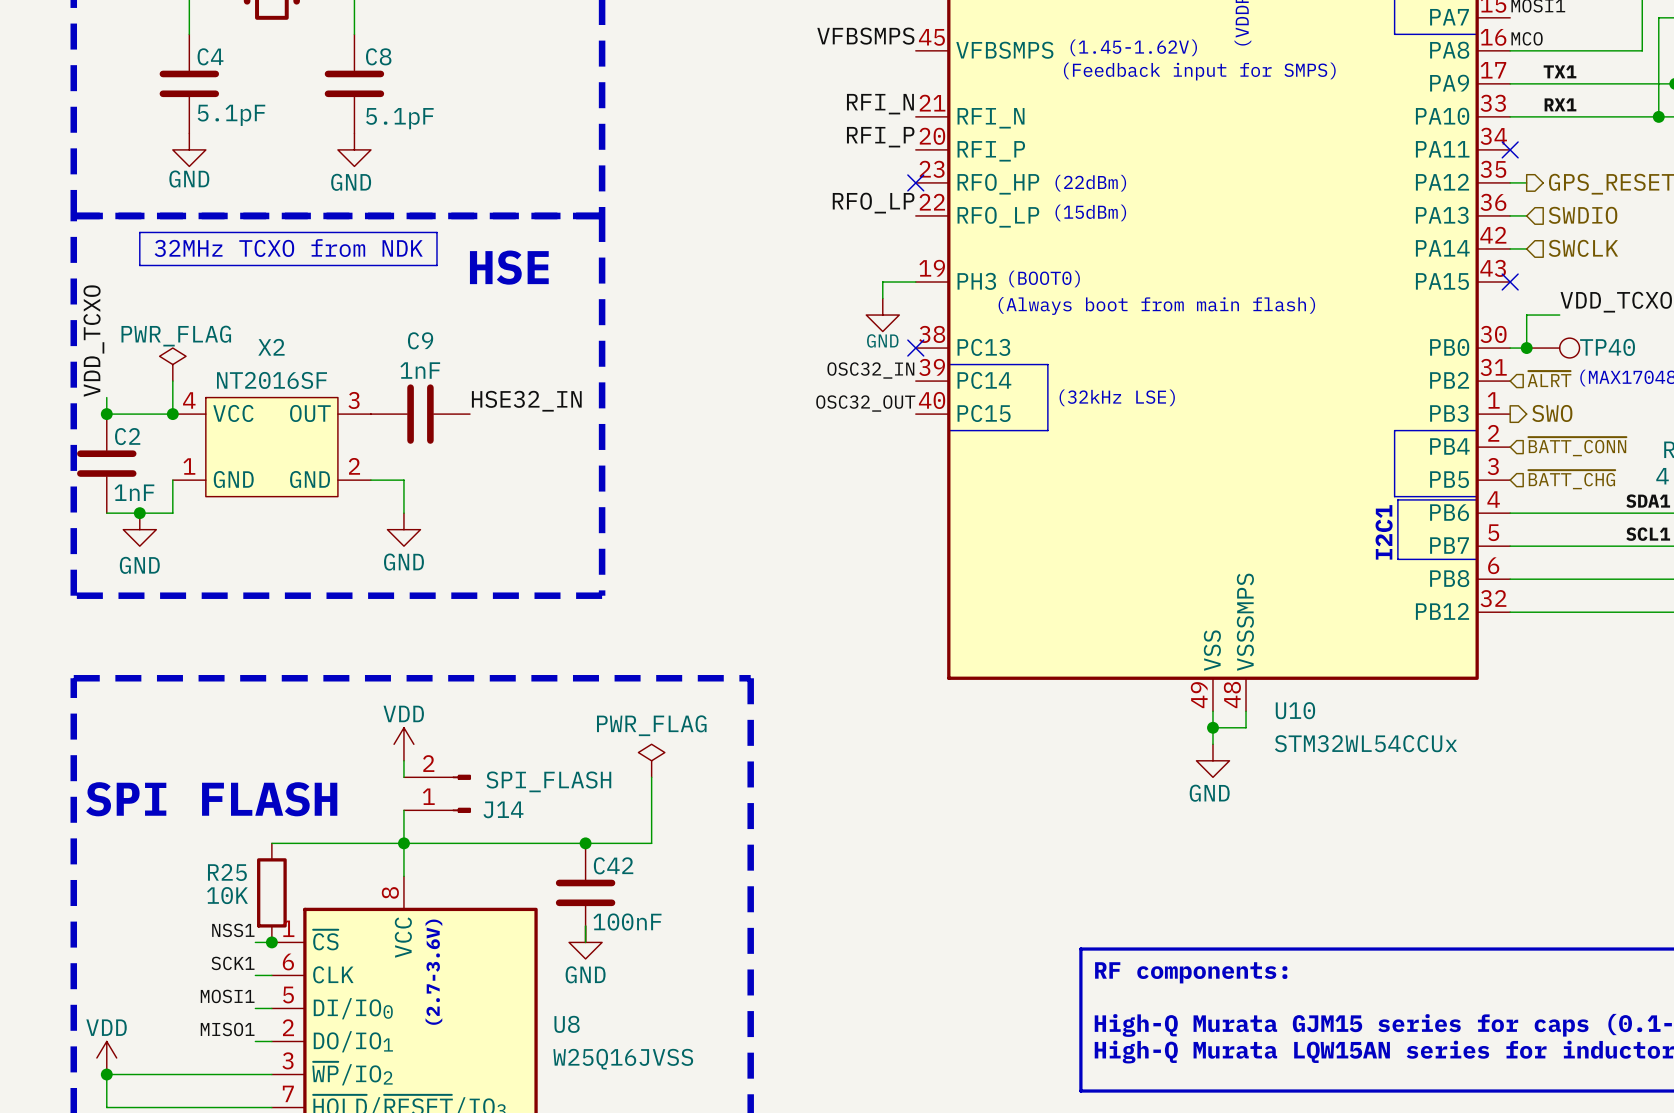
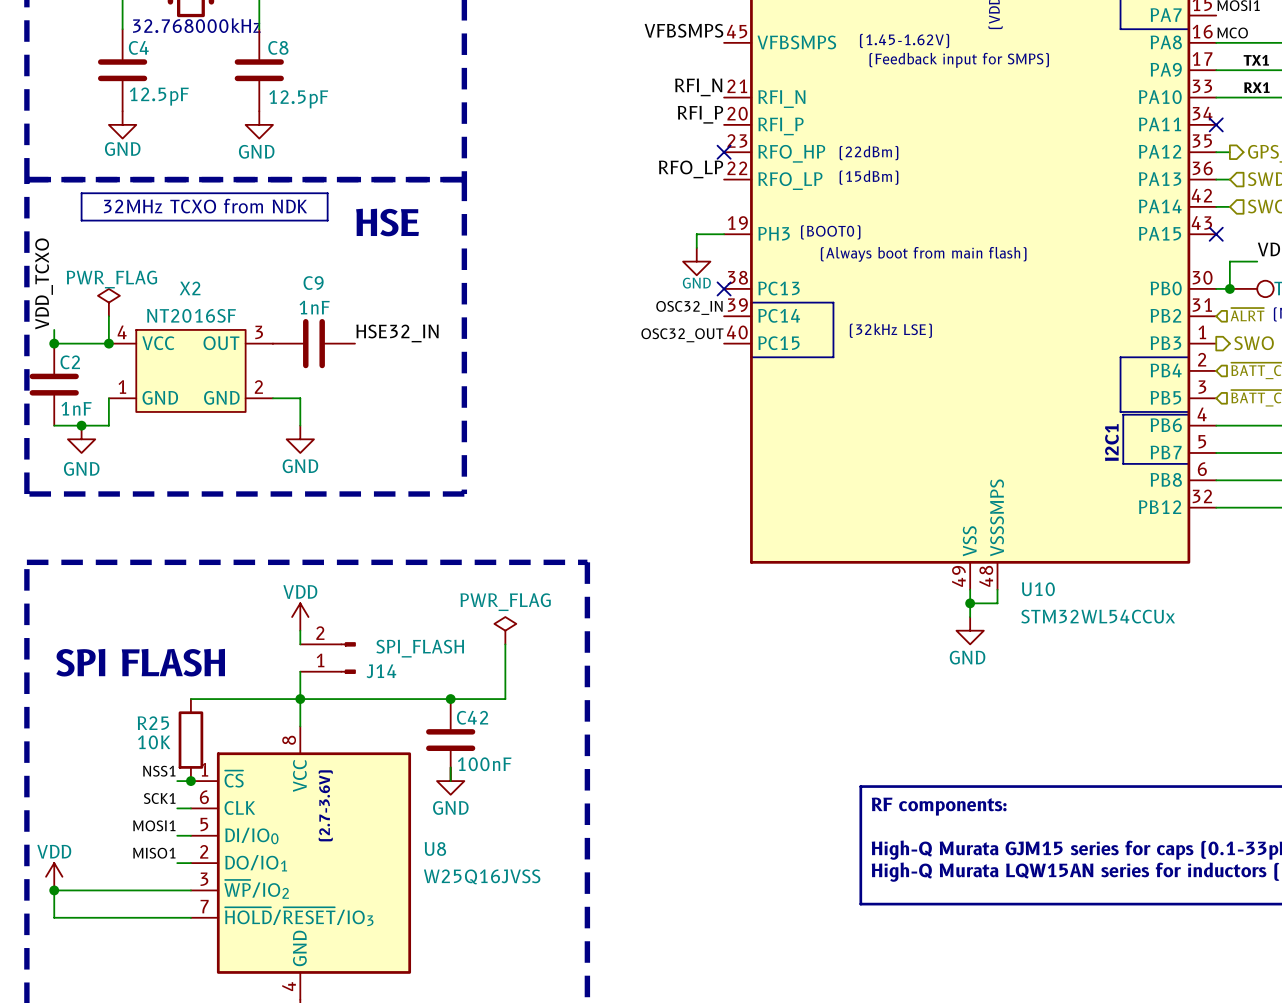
text: none -> 32.768000kHz (196, 25)
C4 value: 5.1pF (231, 115) -> 12.5pF (159, 96)
C8 value: 5.1pF (399, 118) -> 12.5pF (298, 99)

